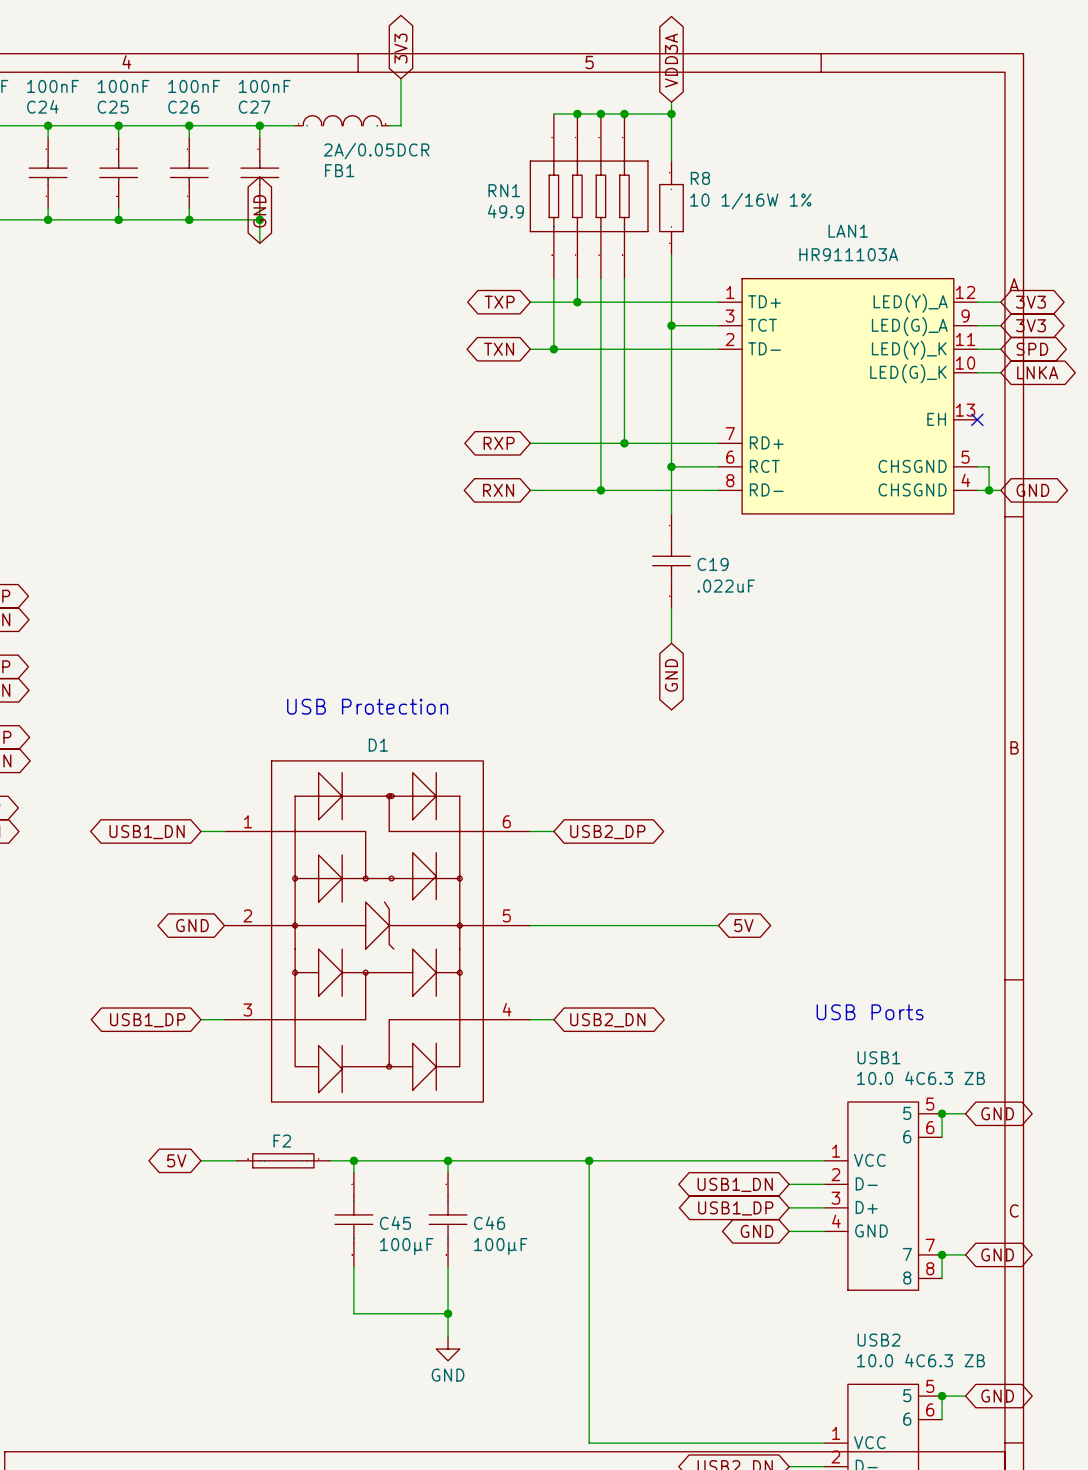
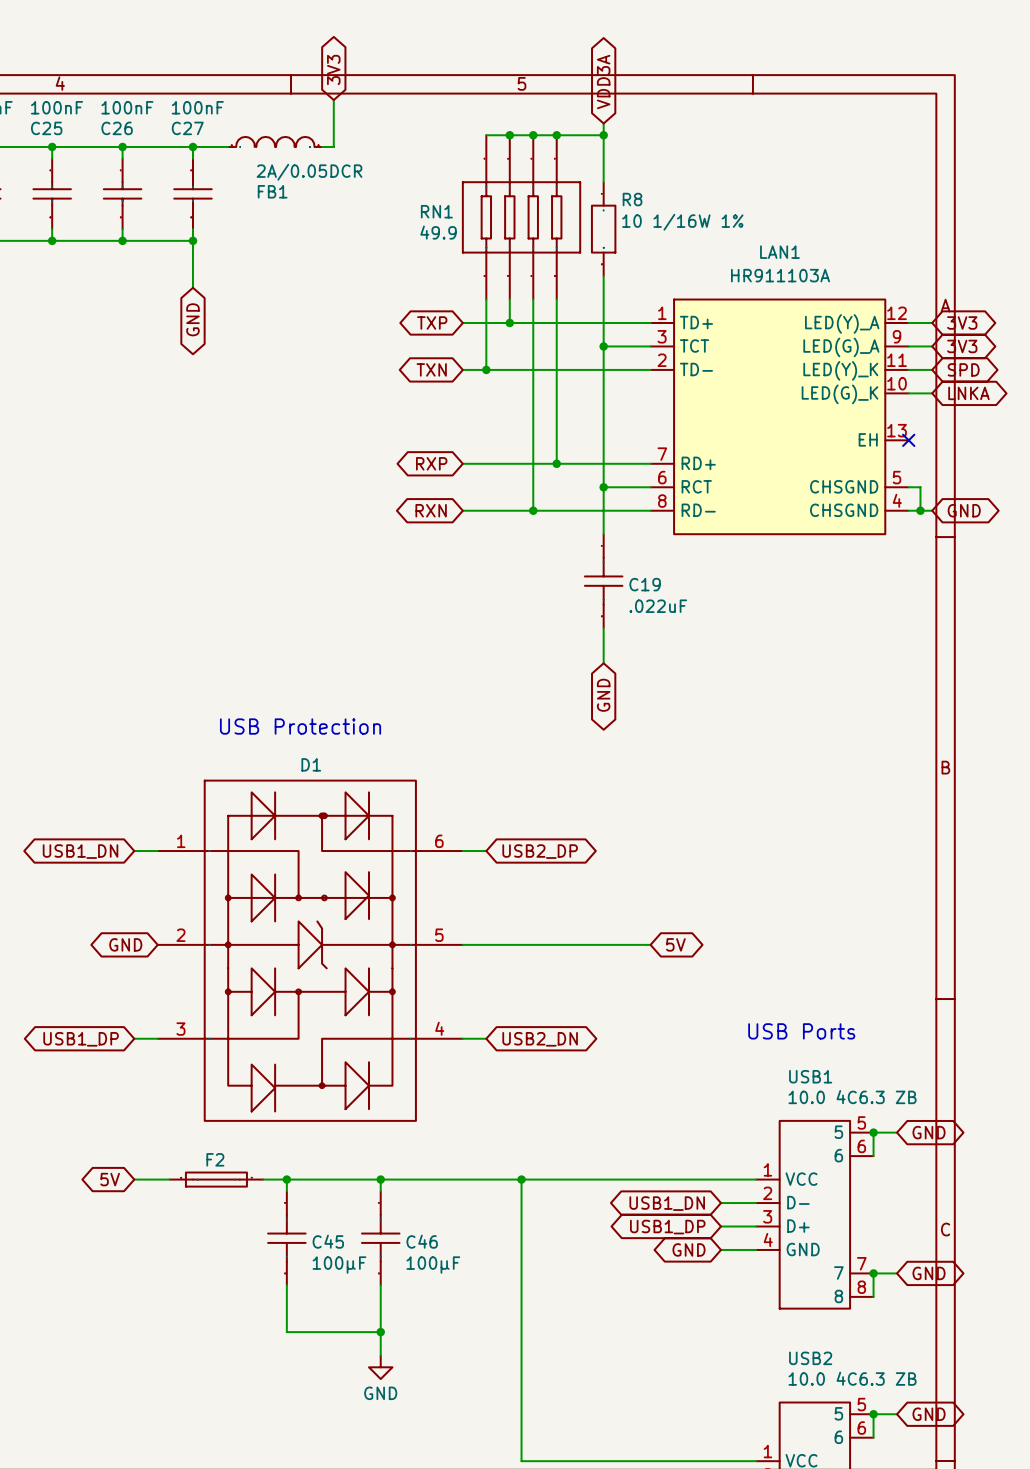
global label rotation: 0° (259, 211) -> 180° (192, 319)
global label position: GND (259, 211) -> GND (192, 319)
wire: none -> (192, 264) (192, 287)

